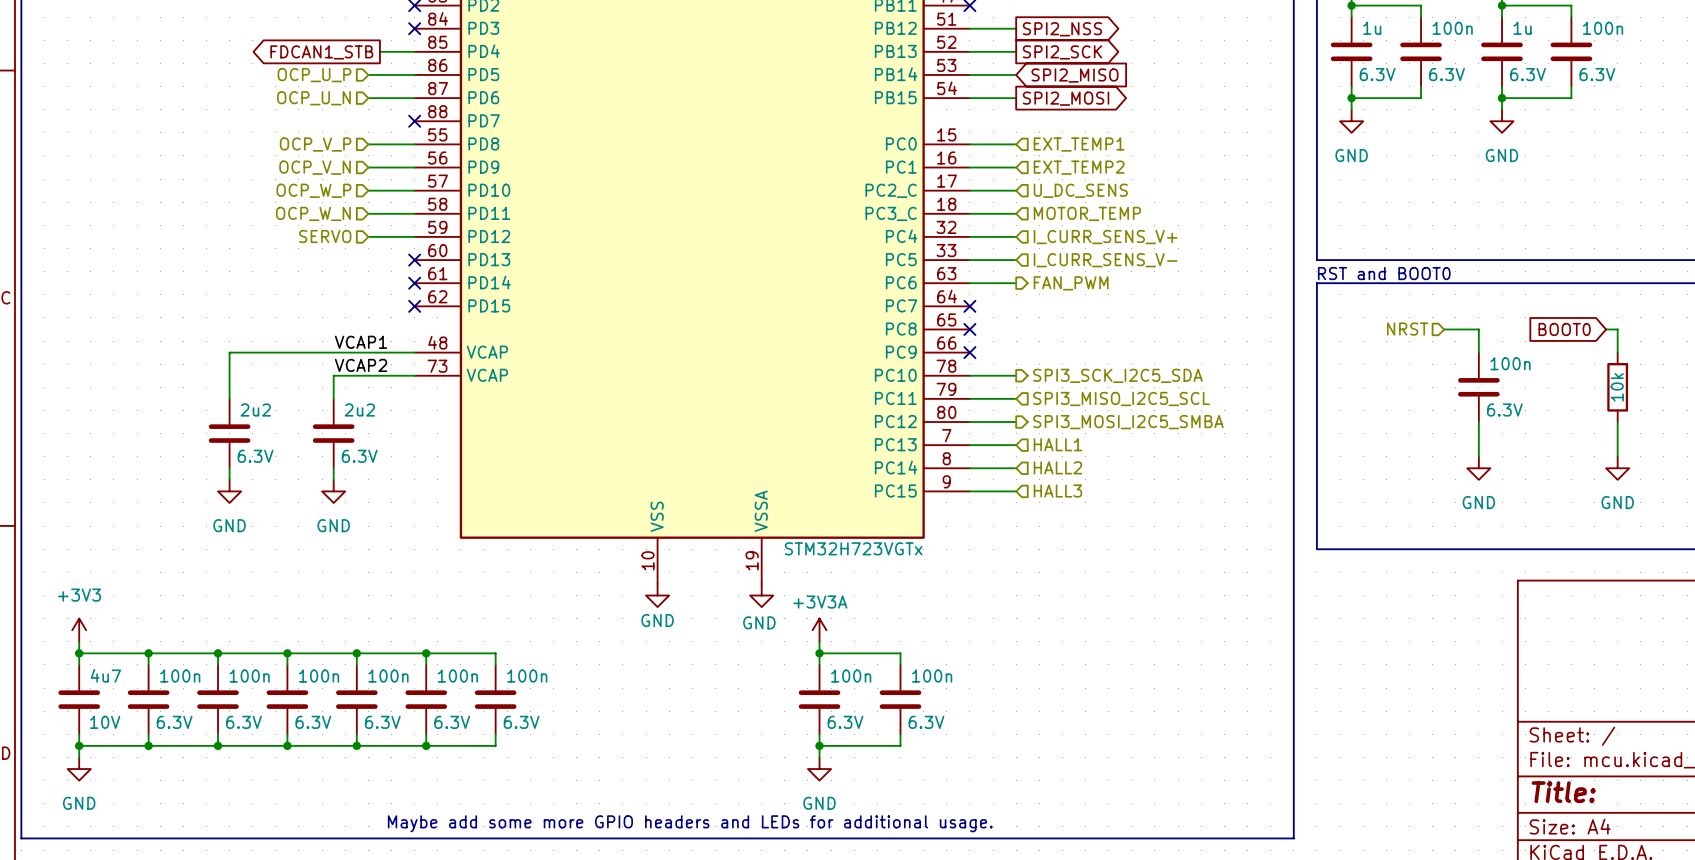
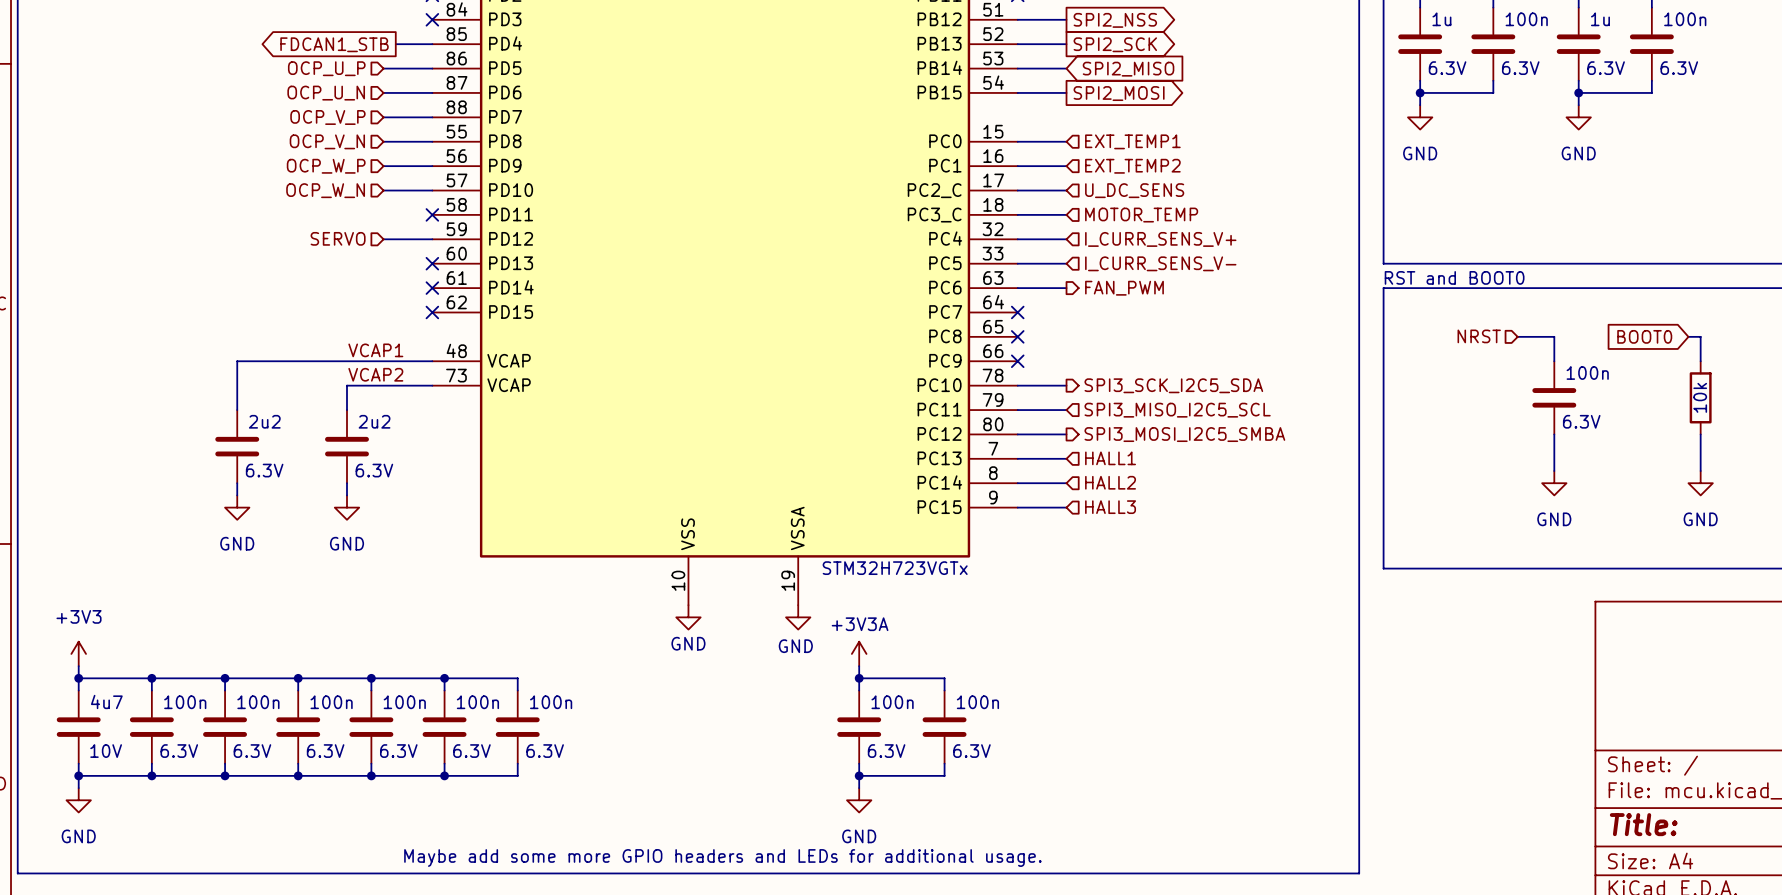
hierarchical label: none -> OCP_V_P (327, 117)
no-connect mark: (414, 121) -> none
hierarchical label: OCP_V_P (315, 144) -> OCP_V_N (327, 141)
hierarchical label: OCP_V_N (315, 167) -> OCP_W_P (326, 166)
hierarchical label: OCP_W_P (313, 190) -> OCP_W_N (325, 190)
hierarchical label: OCP_W_N (313, 213) -> none
wire: (368, 213) (414, 213) -> (383, 117) (432, 117)
no-connect mark: none -> (432, 214)

